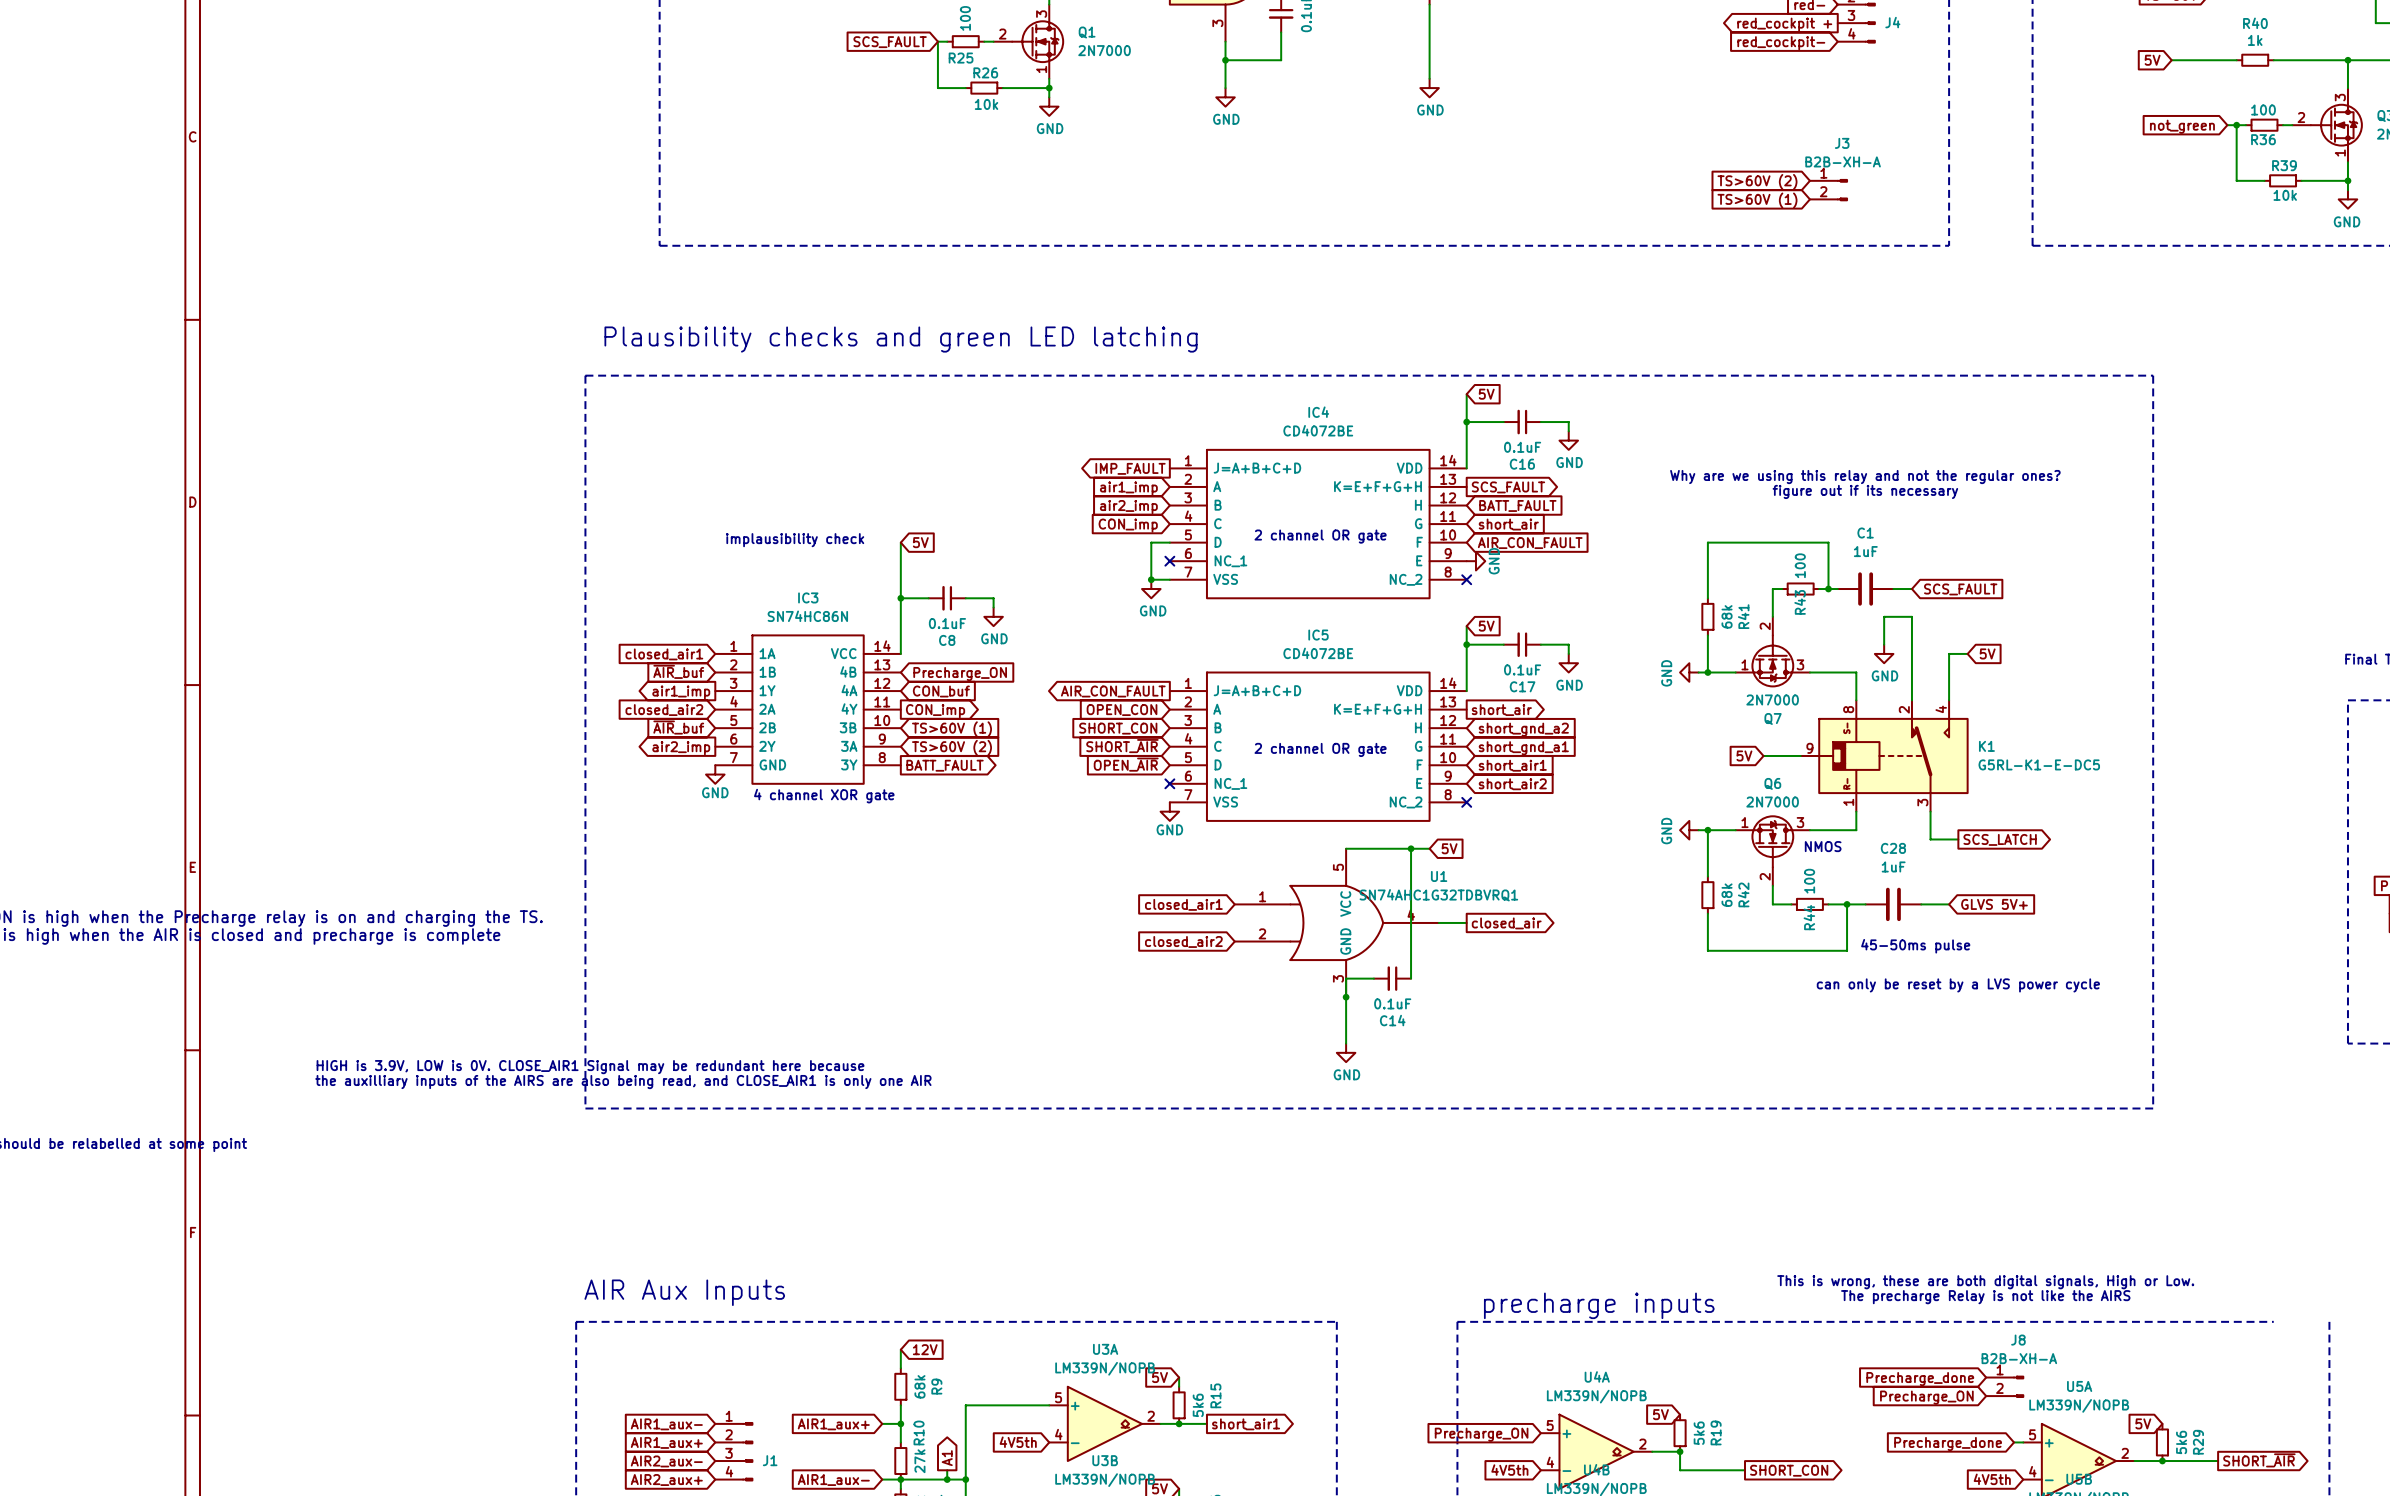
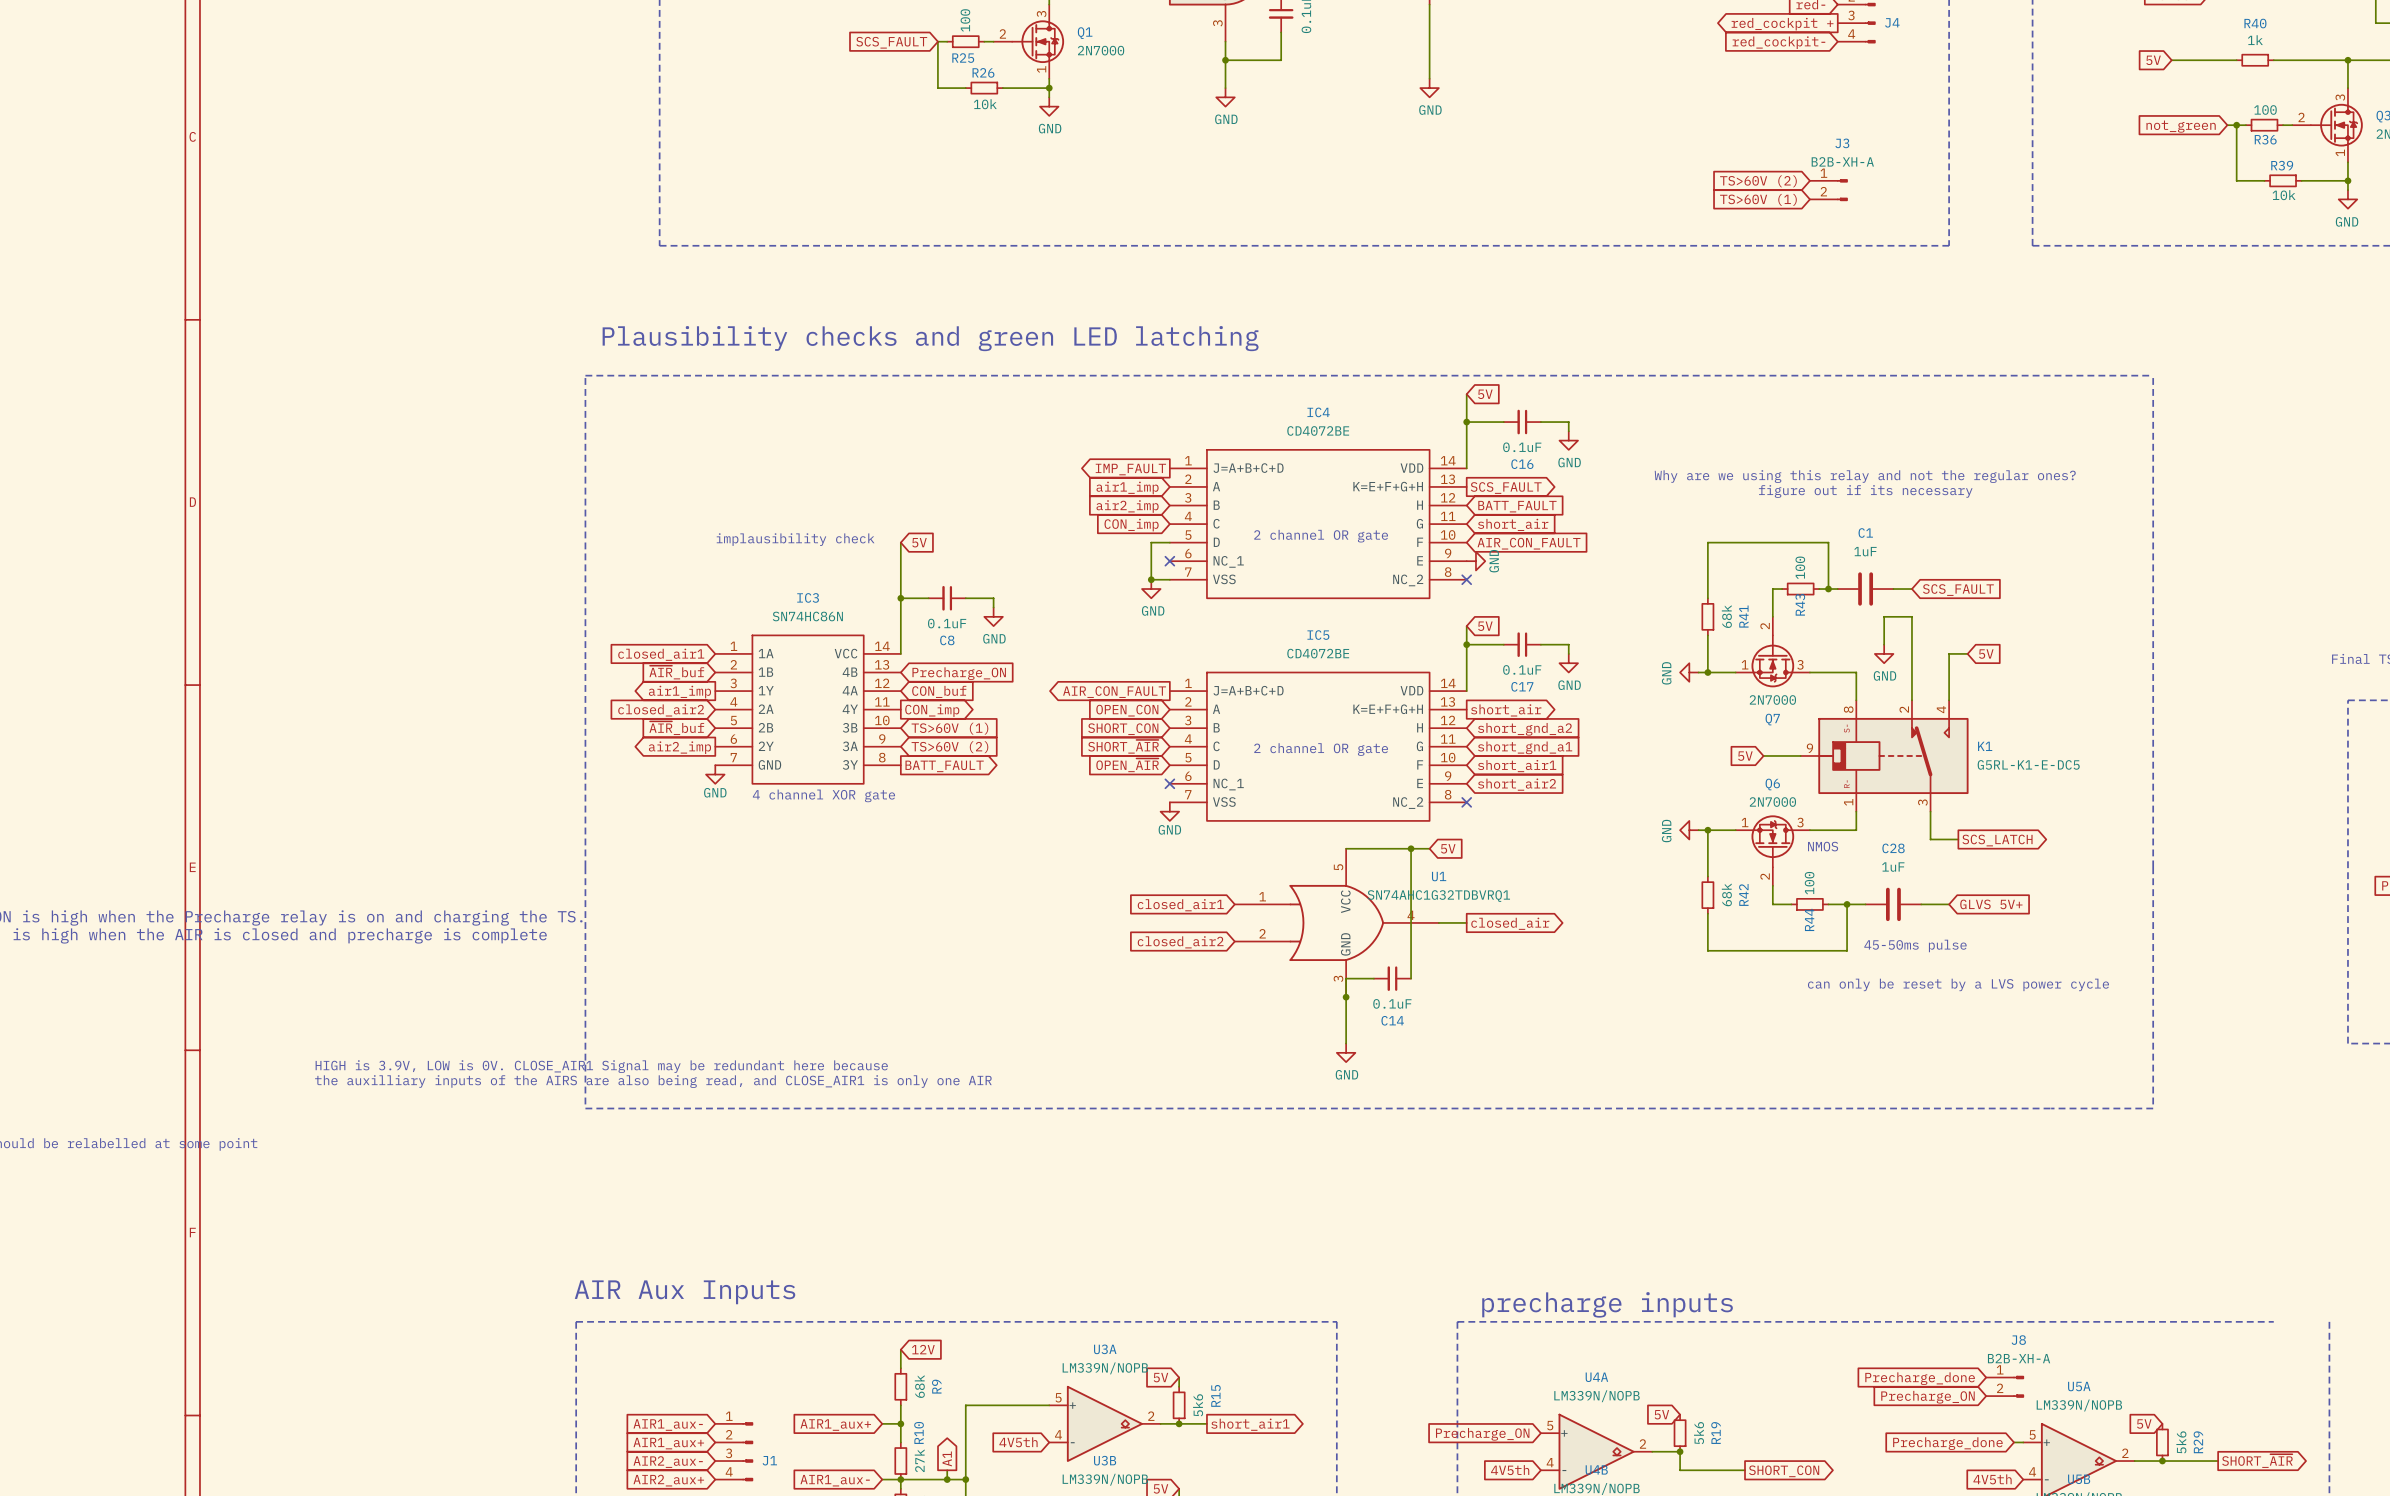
text: This is wrong, these are both digital signals, High or Low. (1985, 1282) -> none
text: The precharge Relay is not like the AIRS (1985, 1297) -> none

